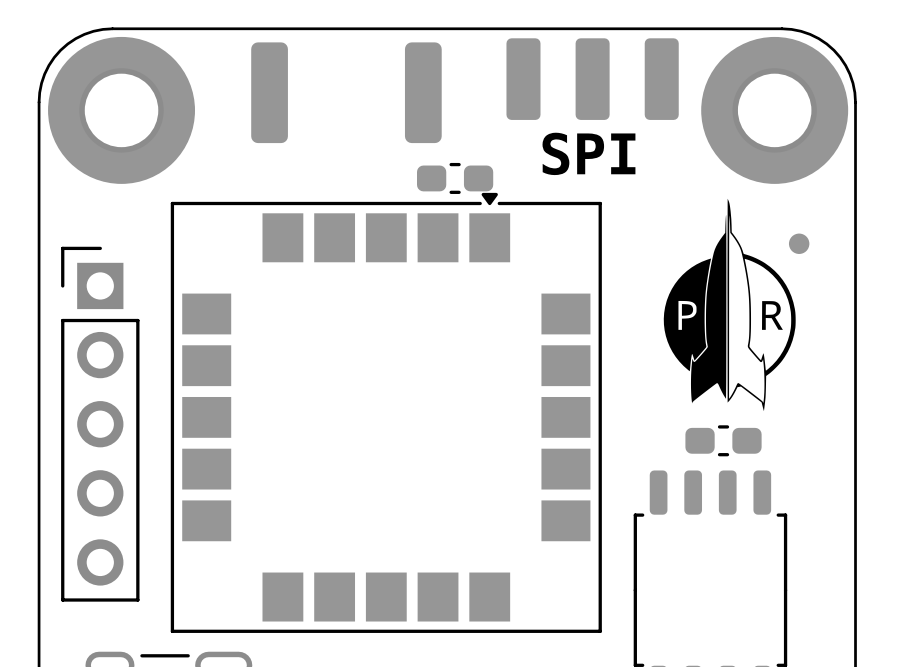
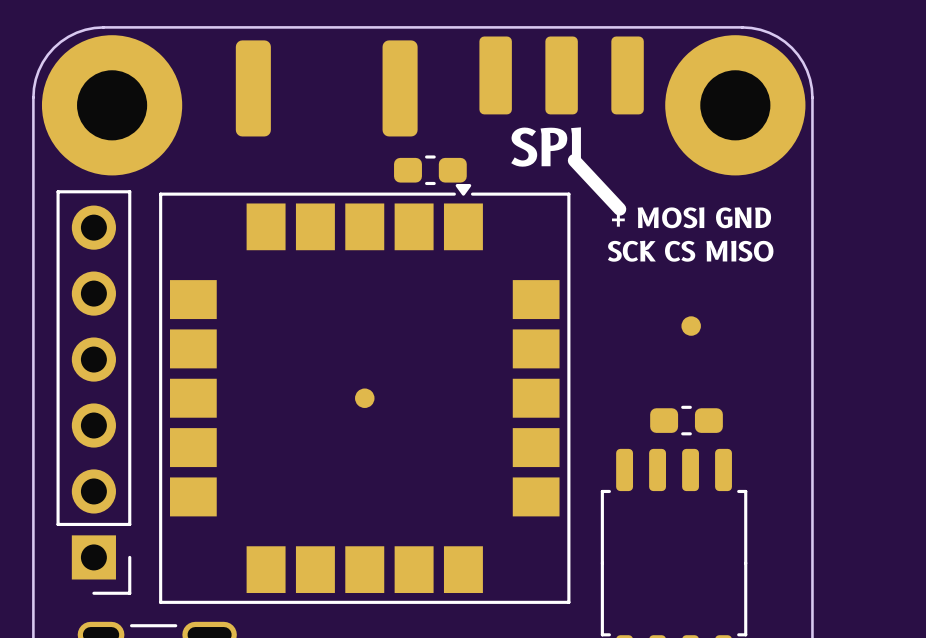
line: none -> (574, 160) (619, 209)
drawing: [663, 198, 796, 412] -> none
text: none -> + MOSI GND (691, 217)
part position: (799, 243) -> (691, 326)
part footprint: [61, 246, 140, 602] -> [56, 190, 132, 595]
text: none -> SCK CS MISO (690, 251)
part: none -> (364, 398)

